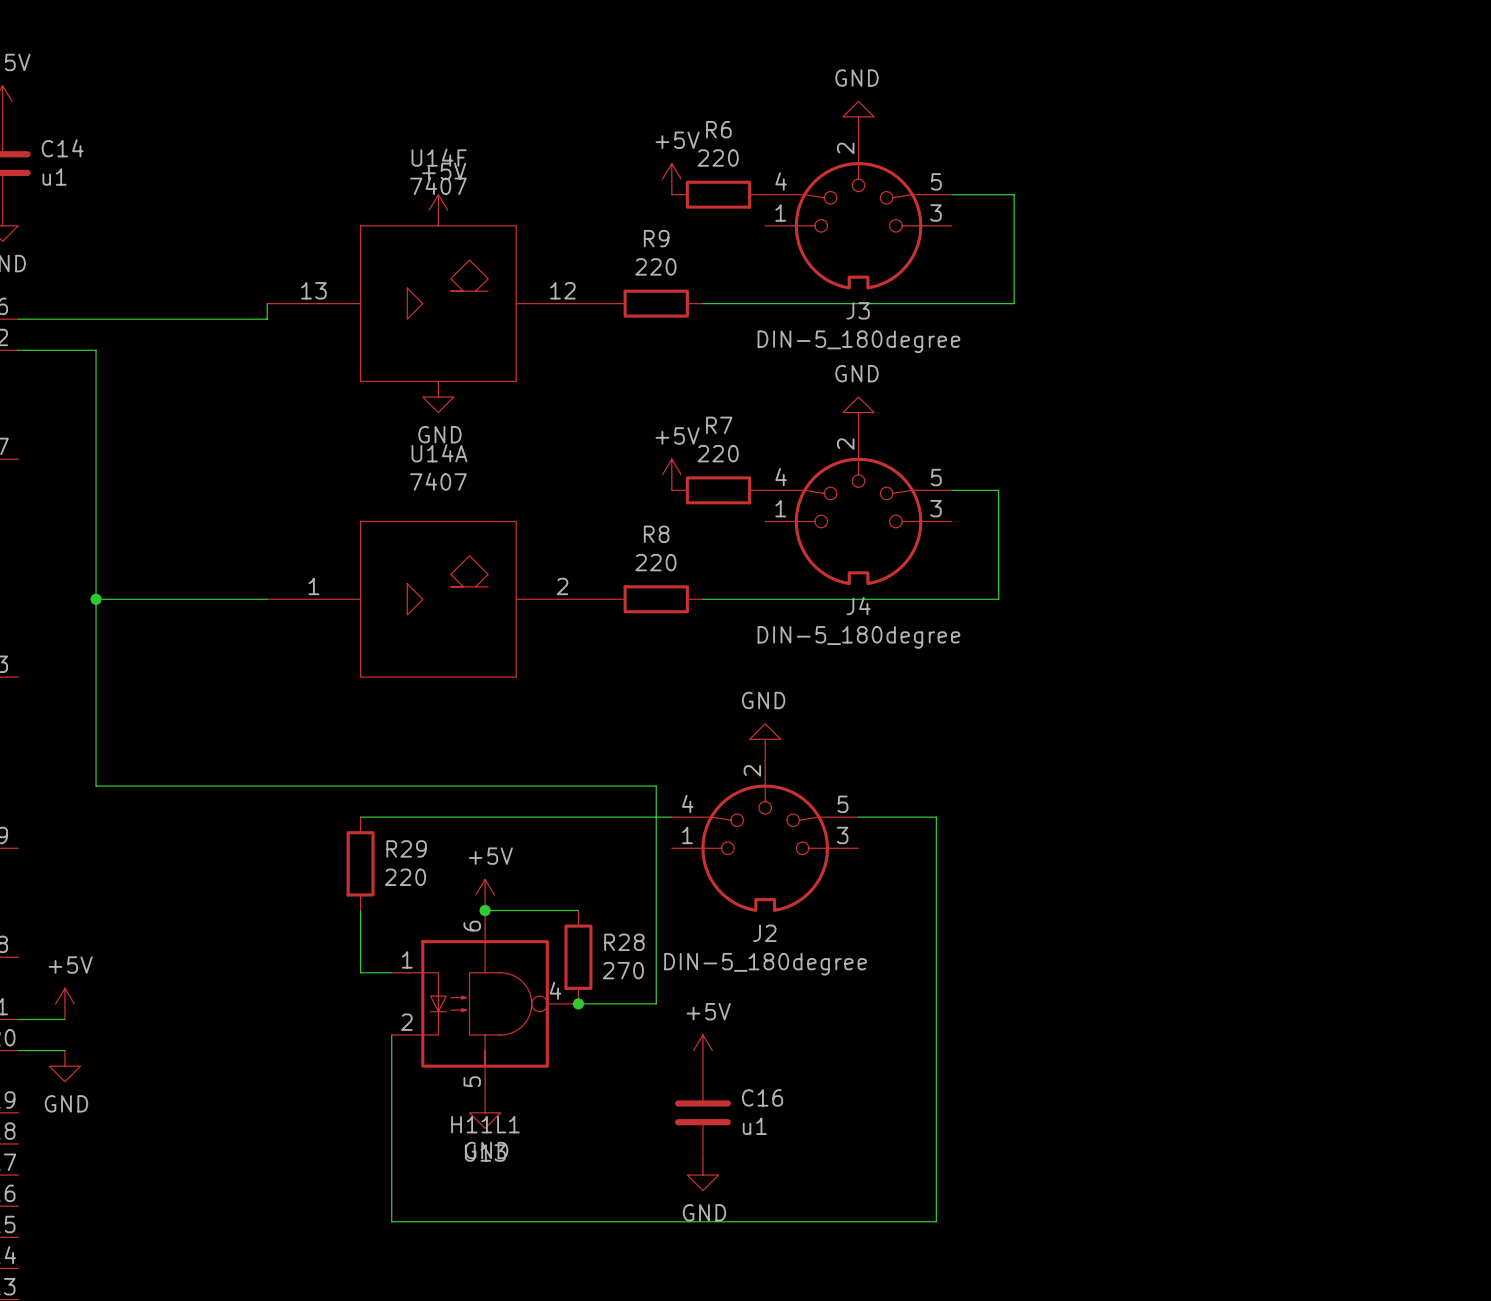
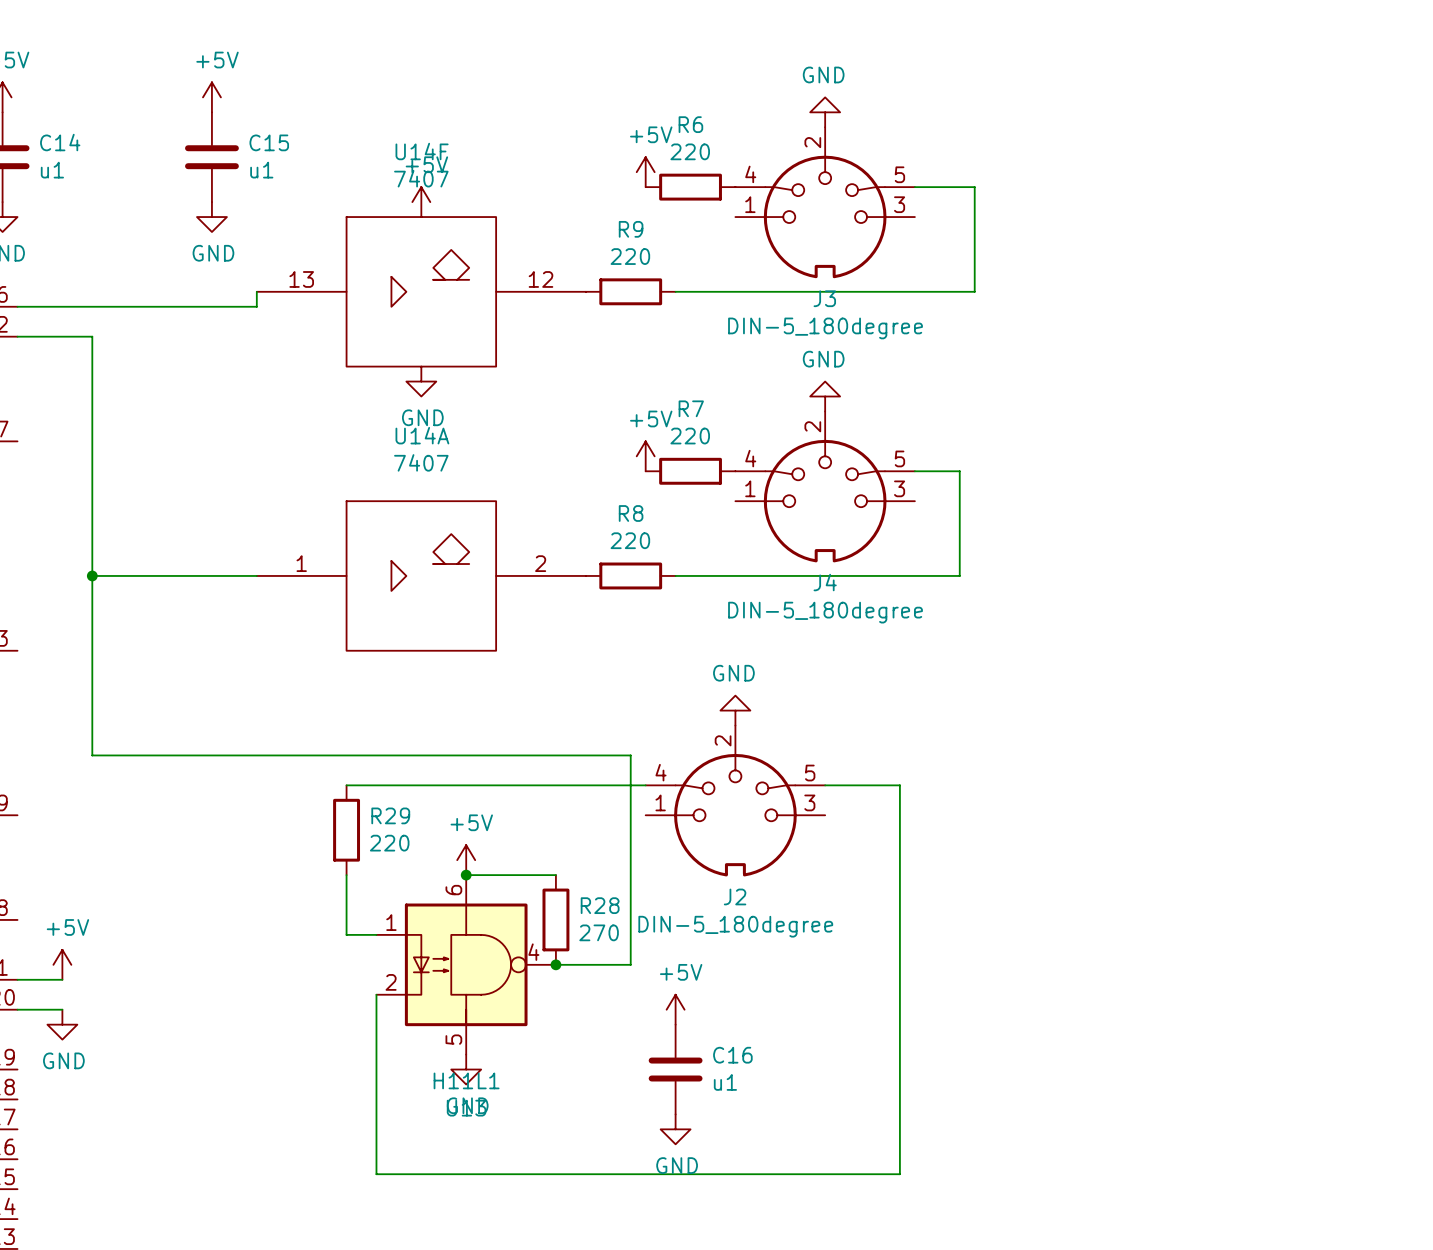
power symbol: none -> +5V (211, 97)
C15: none -> u1 (211, 157)
power symbol: none -> GND (211, 217)

